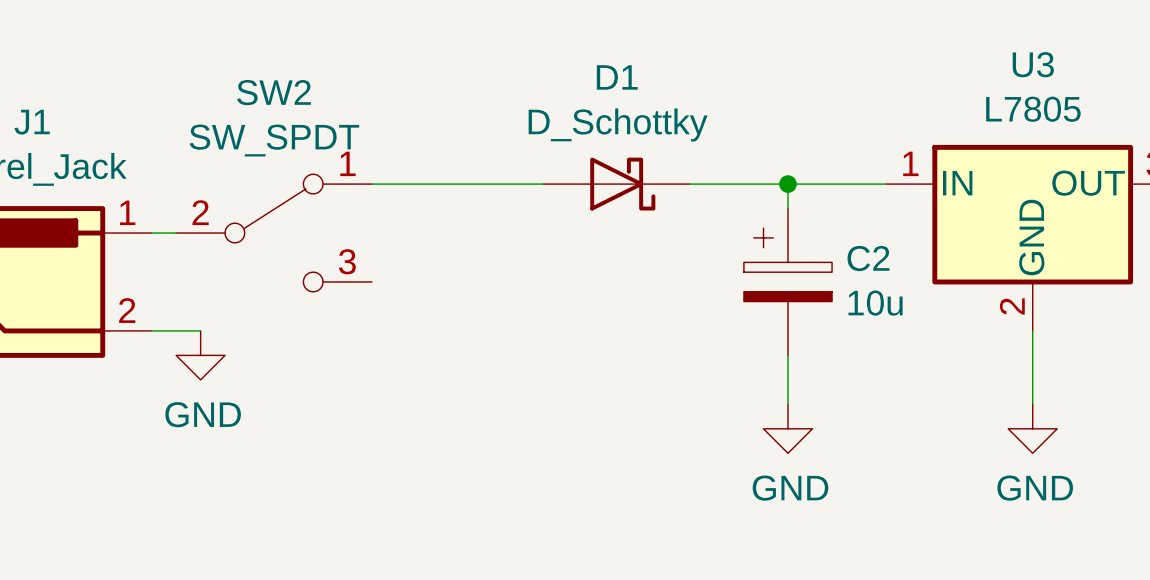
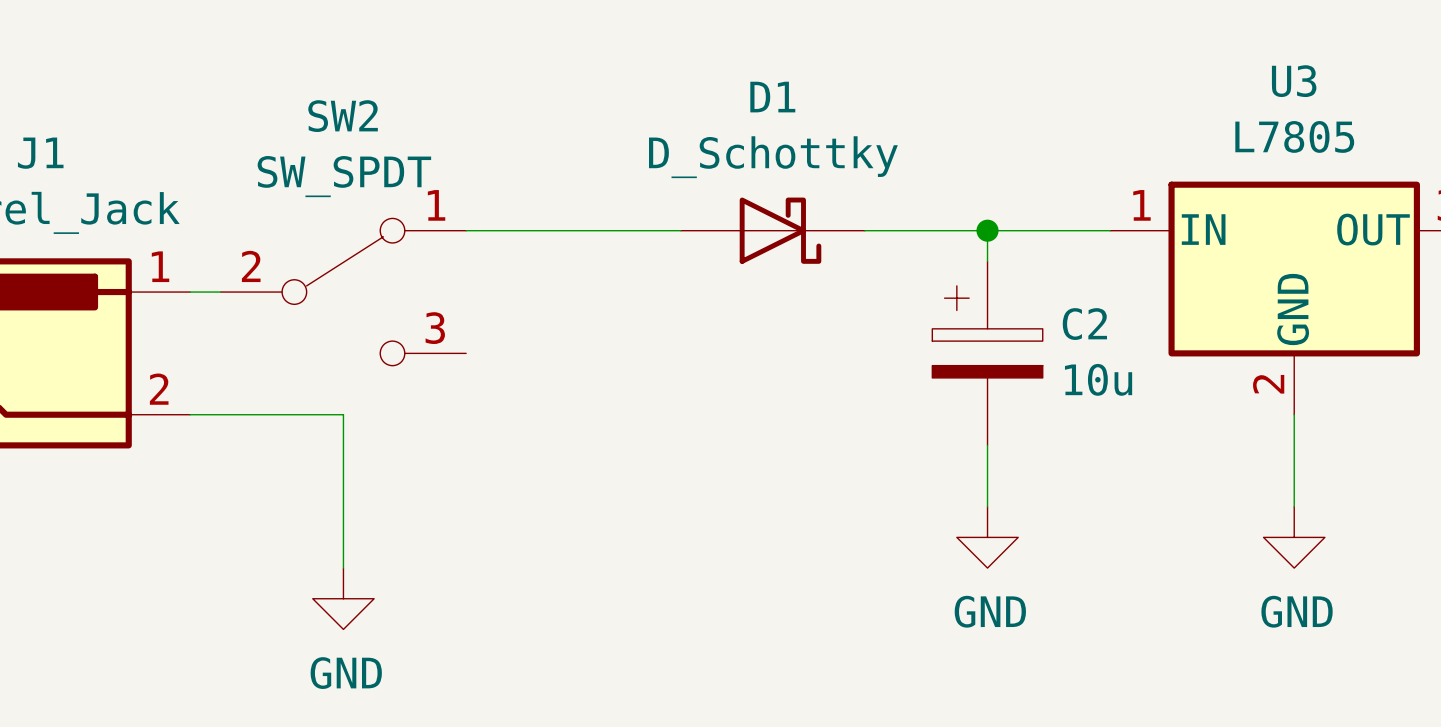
wire: none -> (251, 414) (343, 414) (343, 568)
power symbol position: GND (200, 355) -> GND (343, 598)

